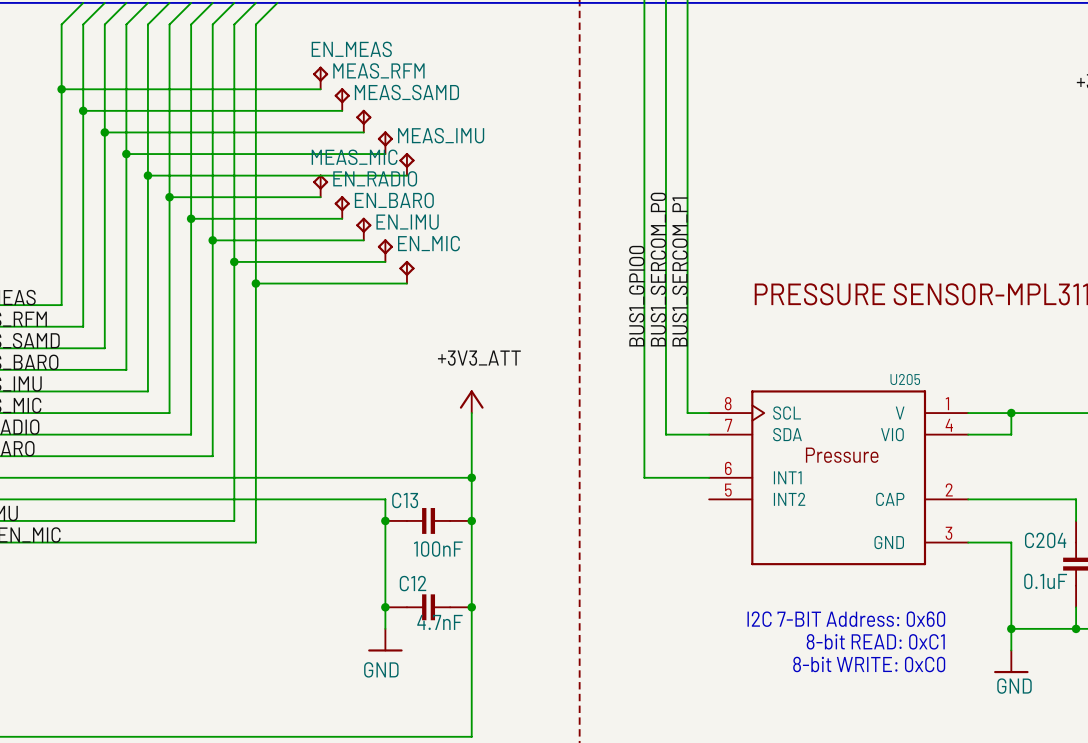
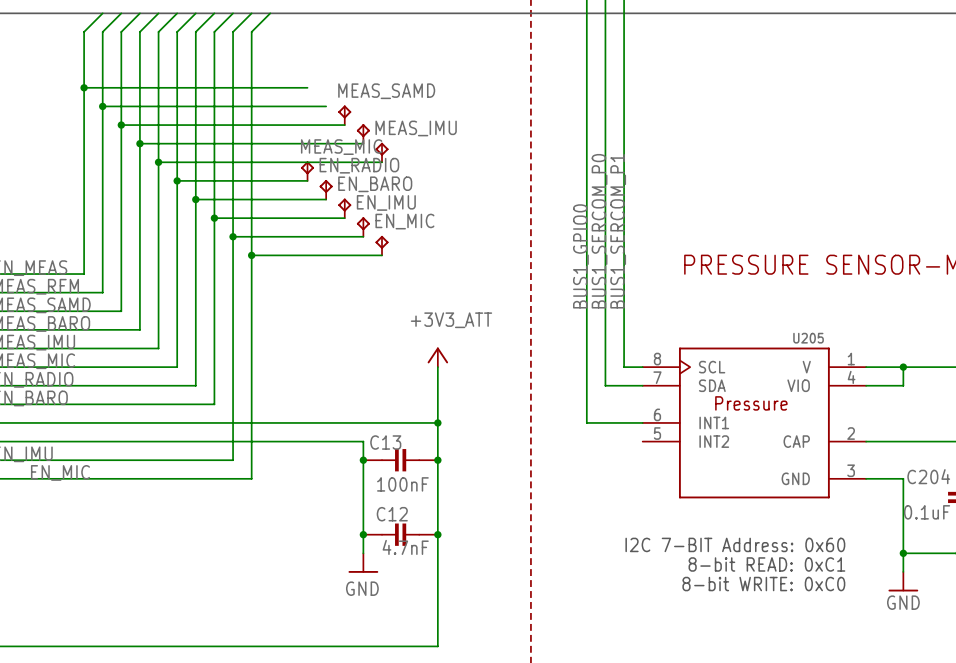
EN_MEAS: (320, 77) -> none
MEAS_RFM: (342, 99) -> none

